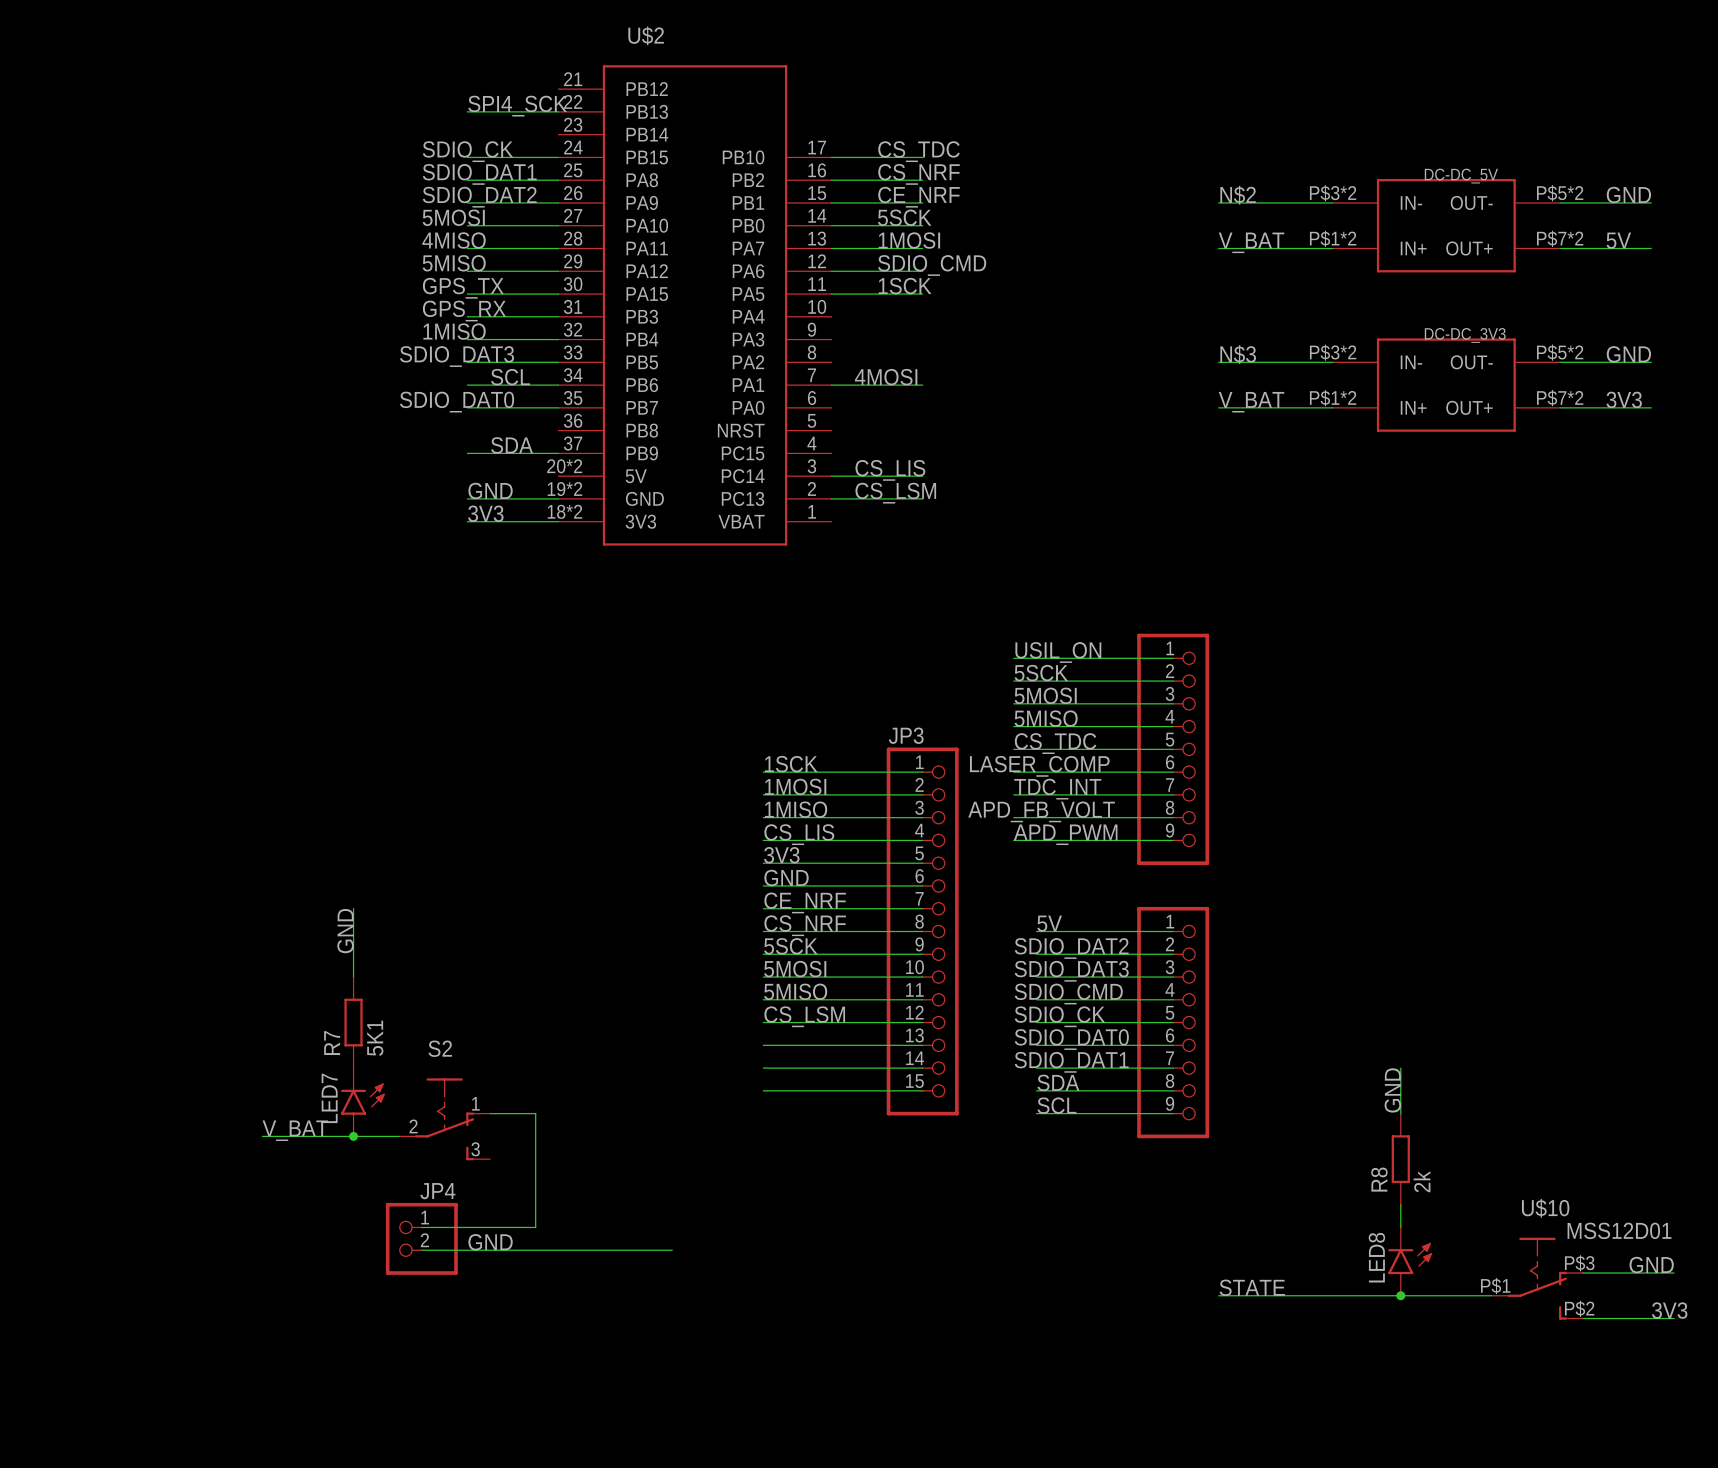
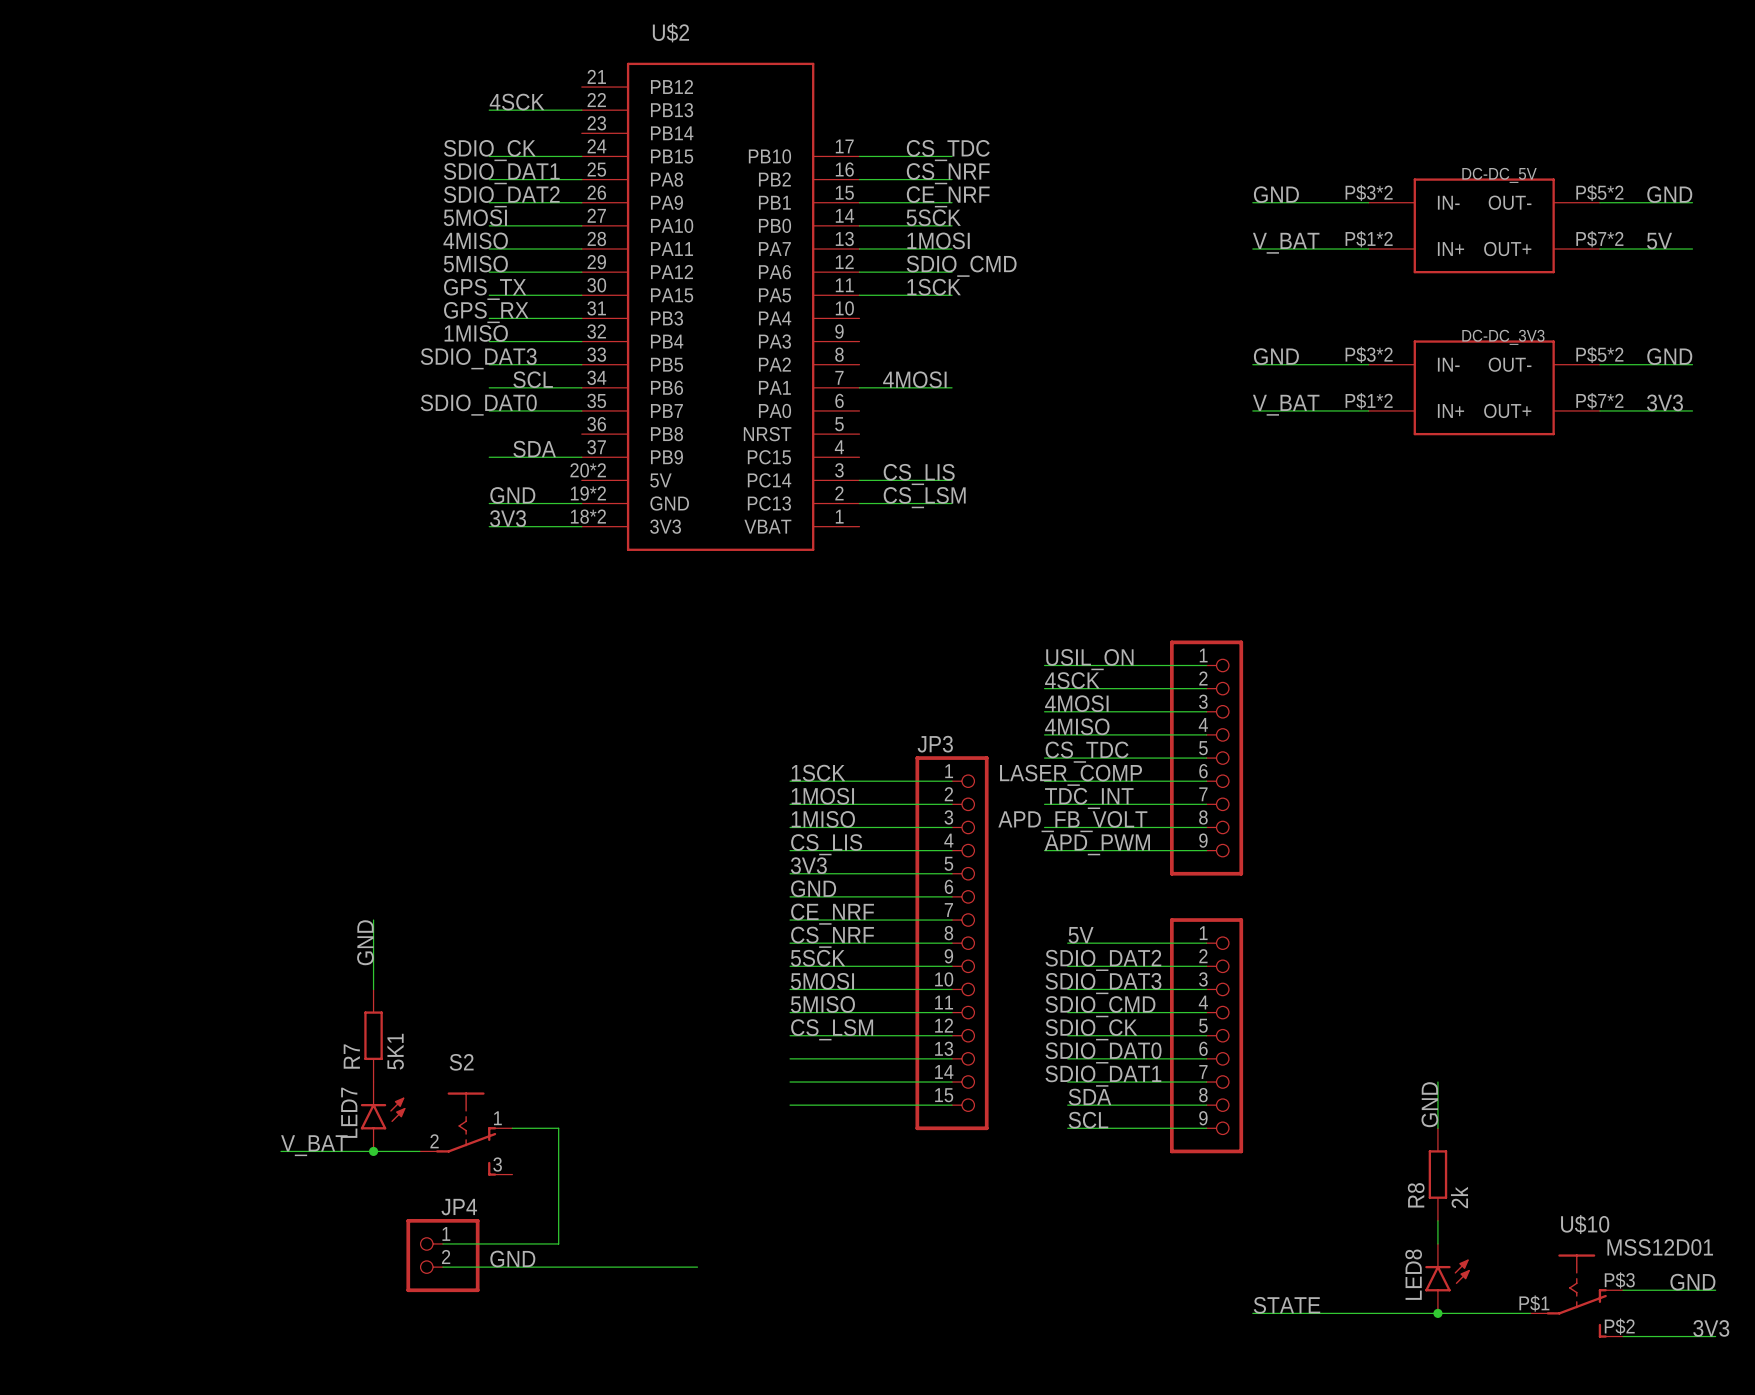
label: SPI4_SCK (517, 106) -> 4SCK (517, 102)
label: N$2 (1238, 195) -> GND (1276, 194)
label: N$3 (1238, 354) -> GND (1276, 356)
label: 5SCK (1041, 673) -> 4SCK (1072, 680)
label: 5MOSI (1045, 695) -> 4MOSI (1076, 703)
label: 5MISO (1046, 718) -> 4MISO (1077, 726)

